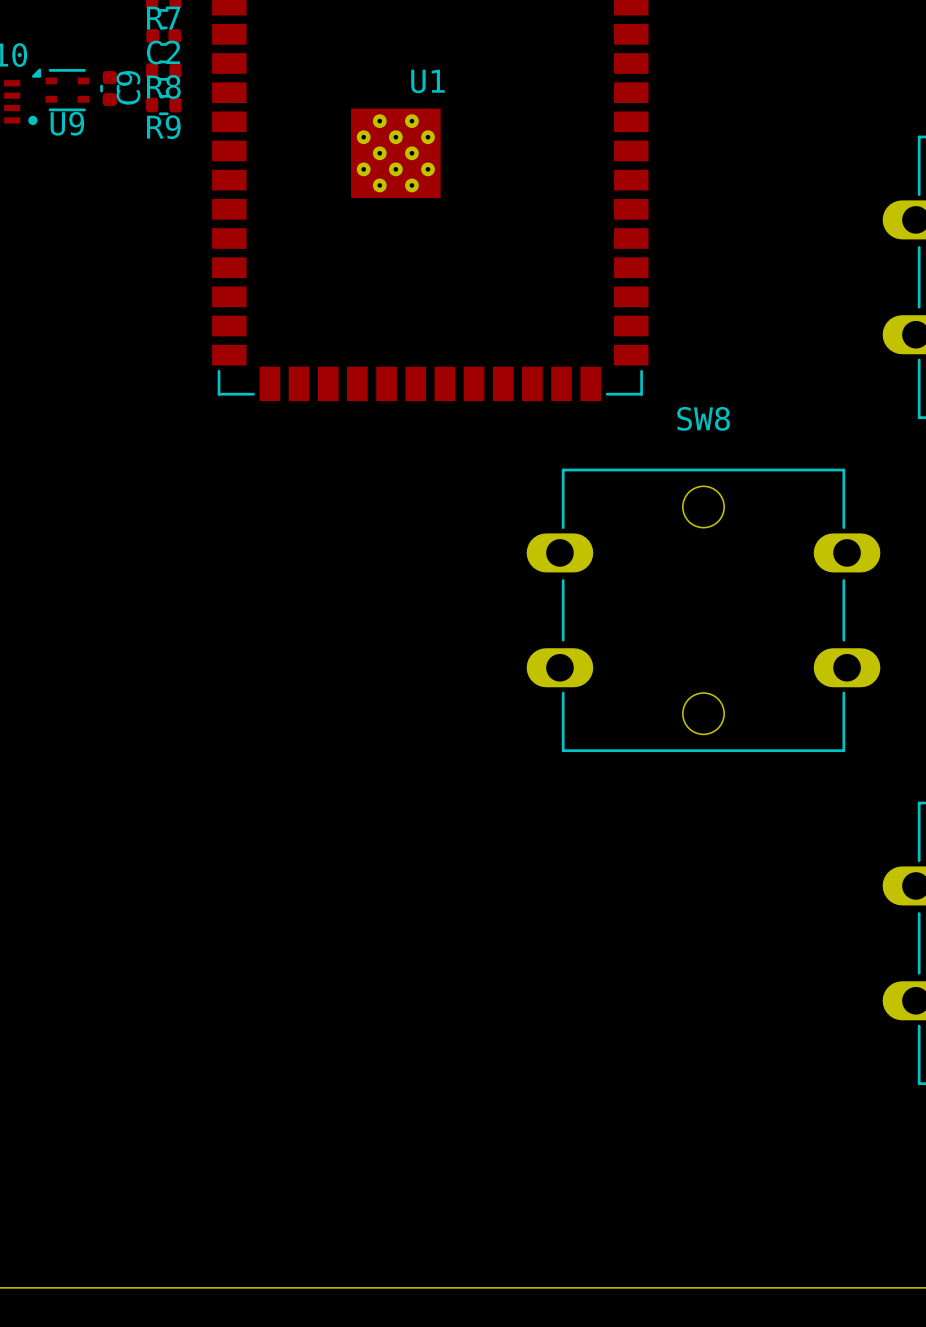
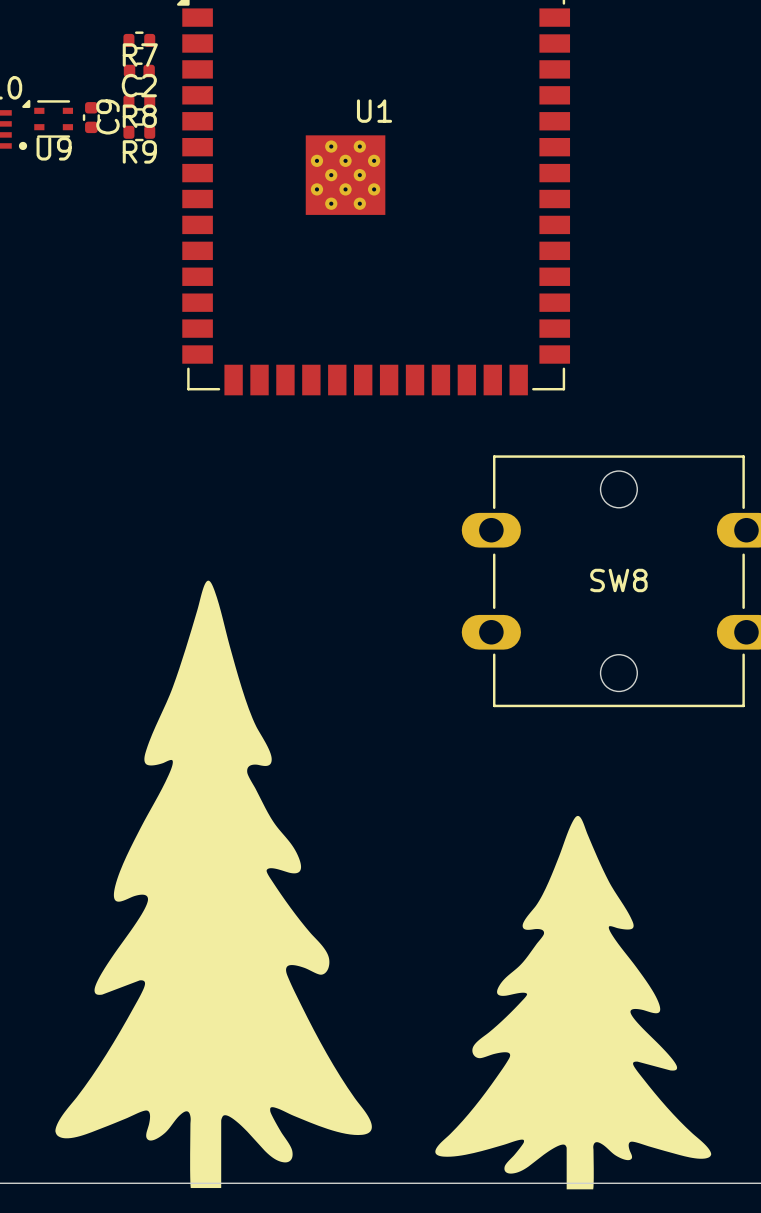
SW8 name position: SW8 (703, 418) -> SW8 (618, 580)
drawing: none -> [55, 580, 372, 1189]
drawing: none -> [435, 815, 712, 1190]

